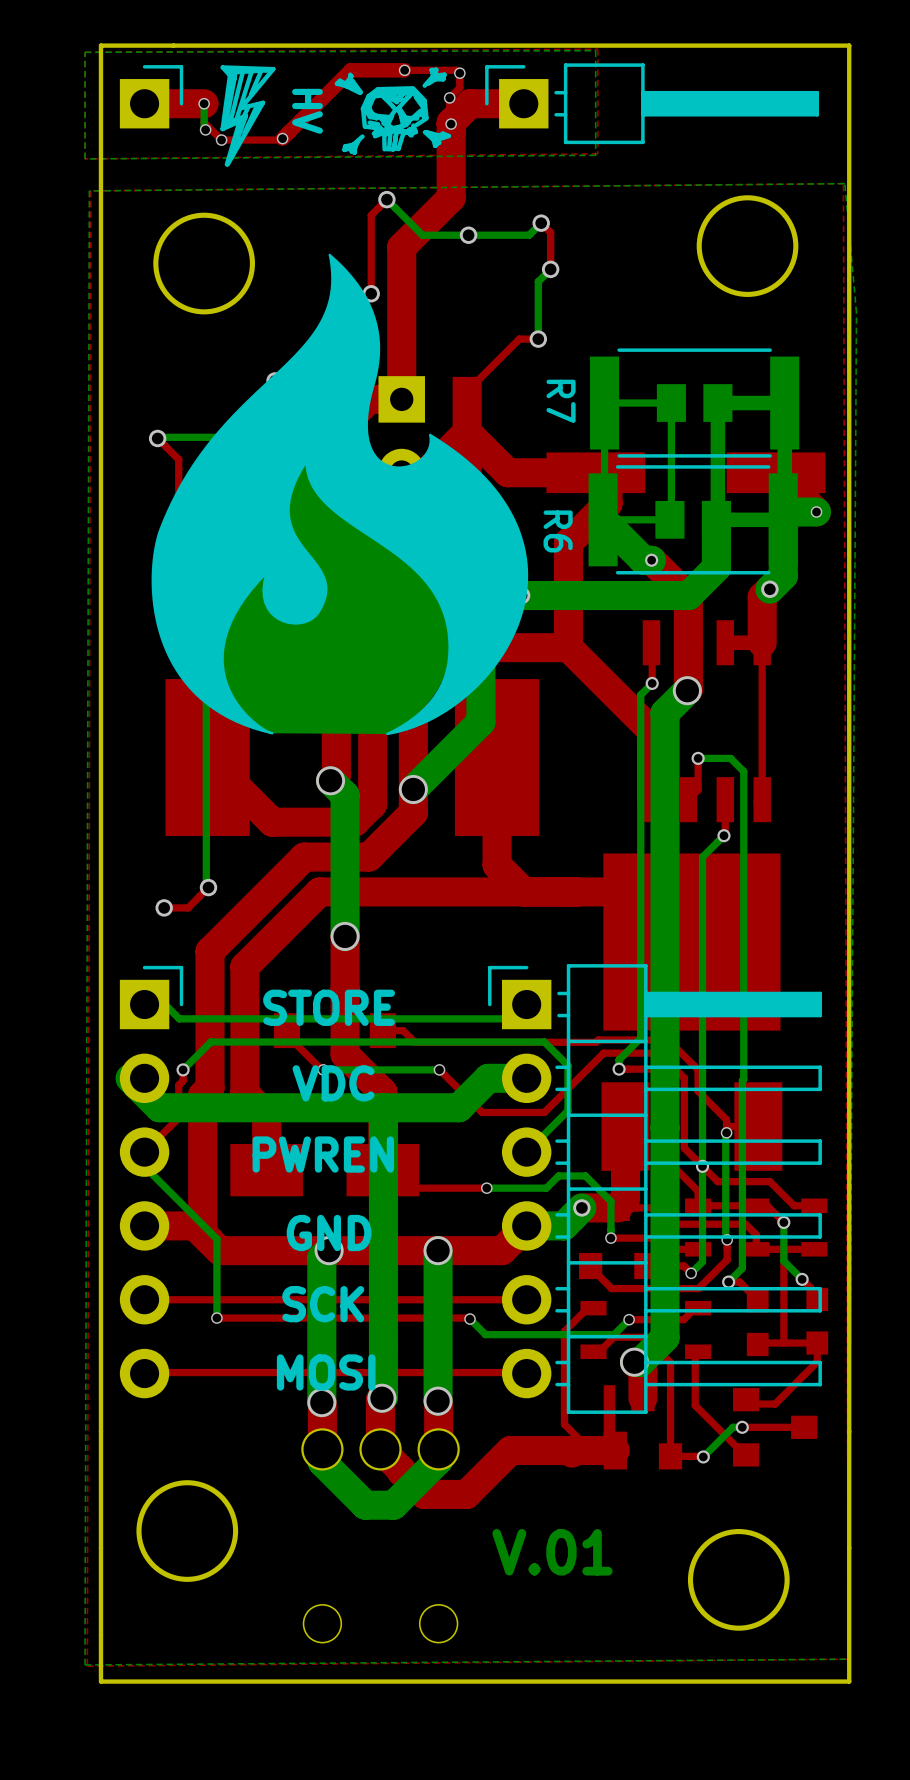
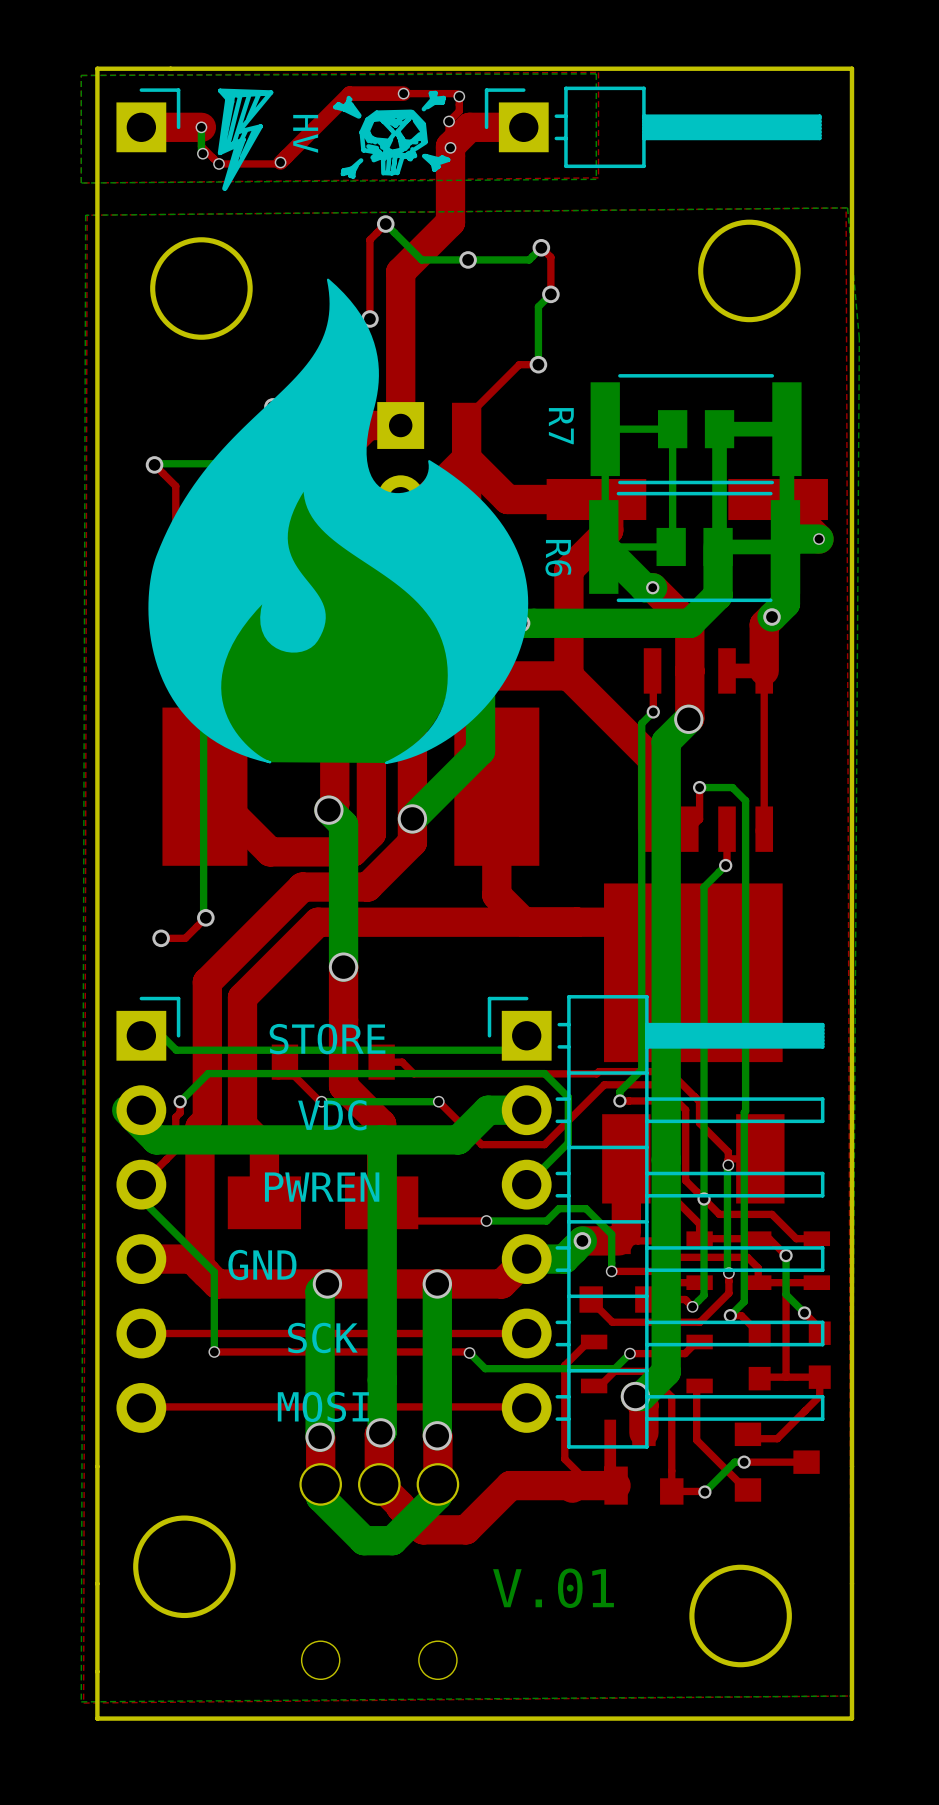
text position: GND (329, 1232) -> GND (262, 1265)

